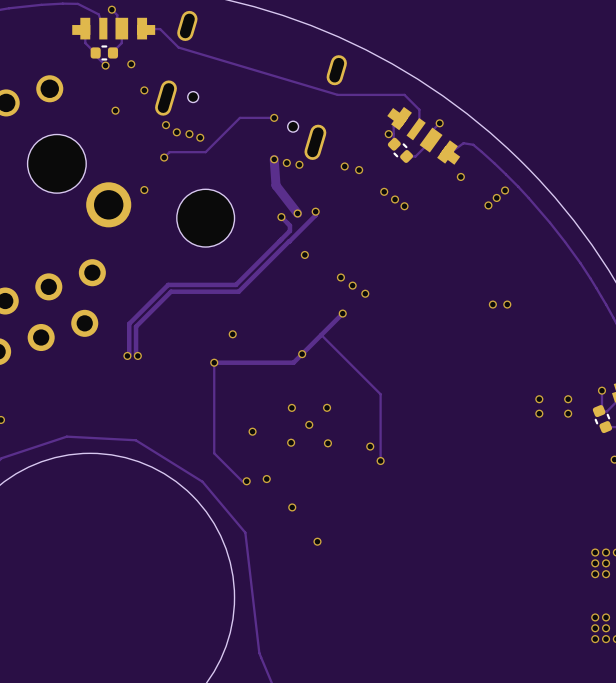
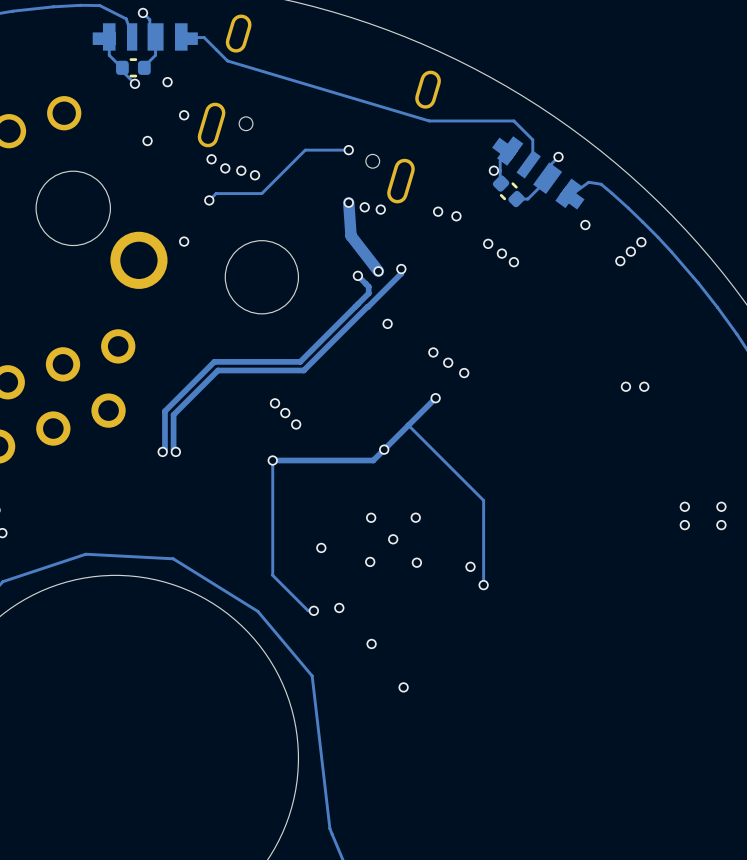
via: none -> (275, 403)
via: none -> (285, 413)

